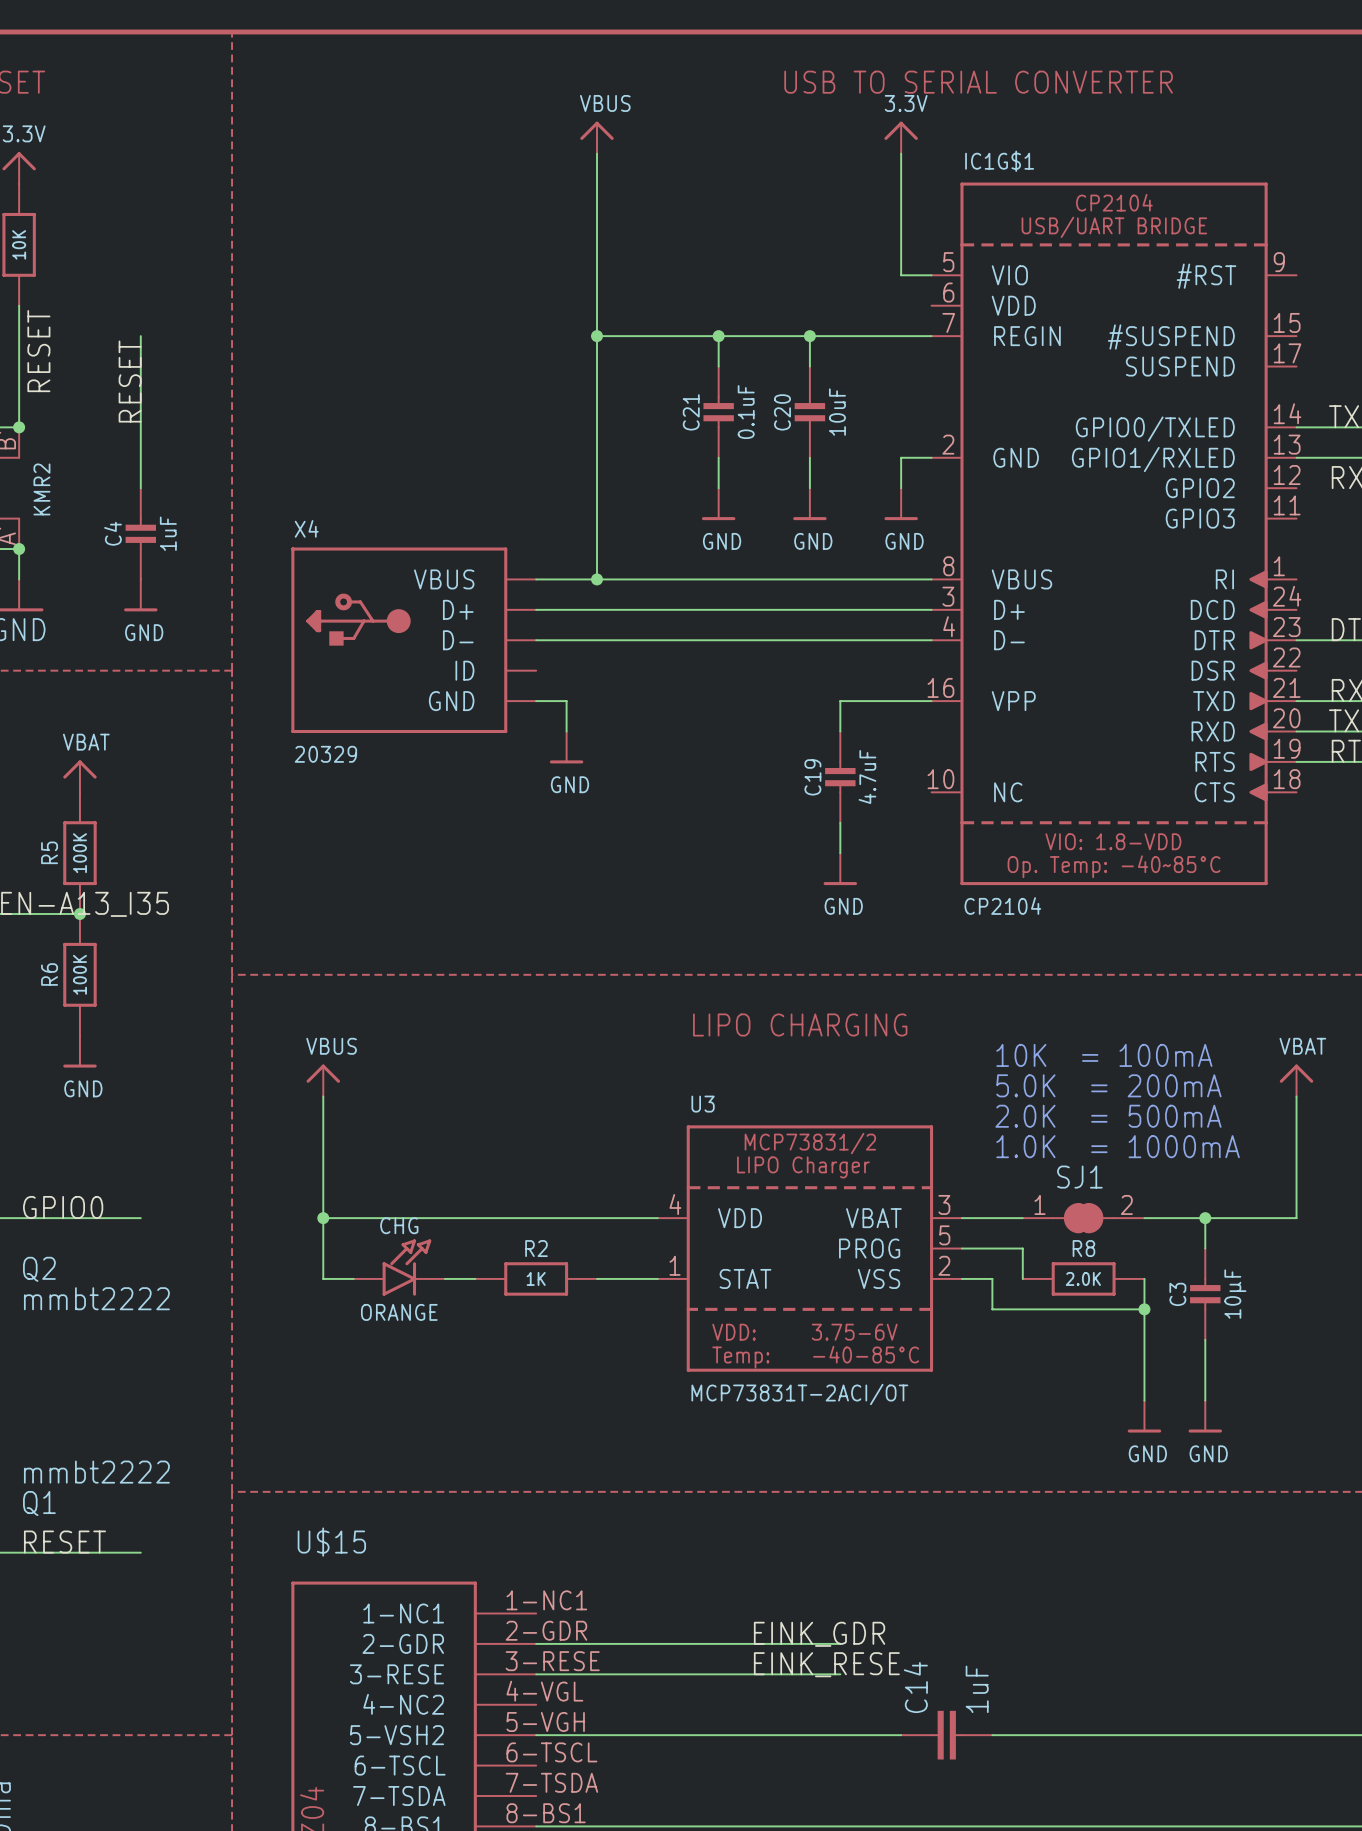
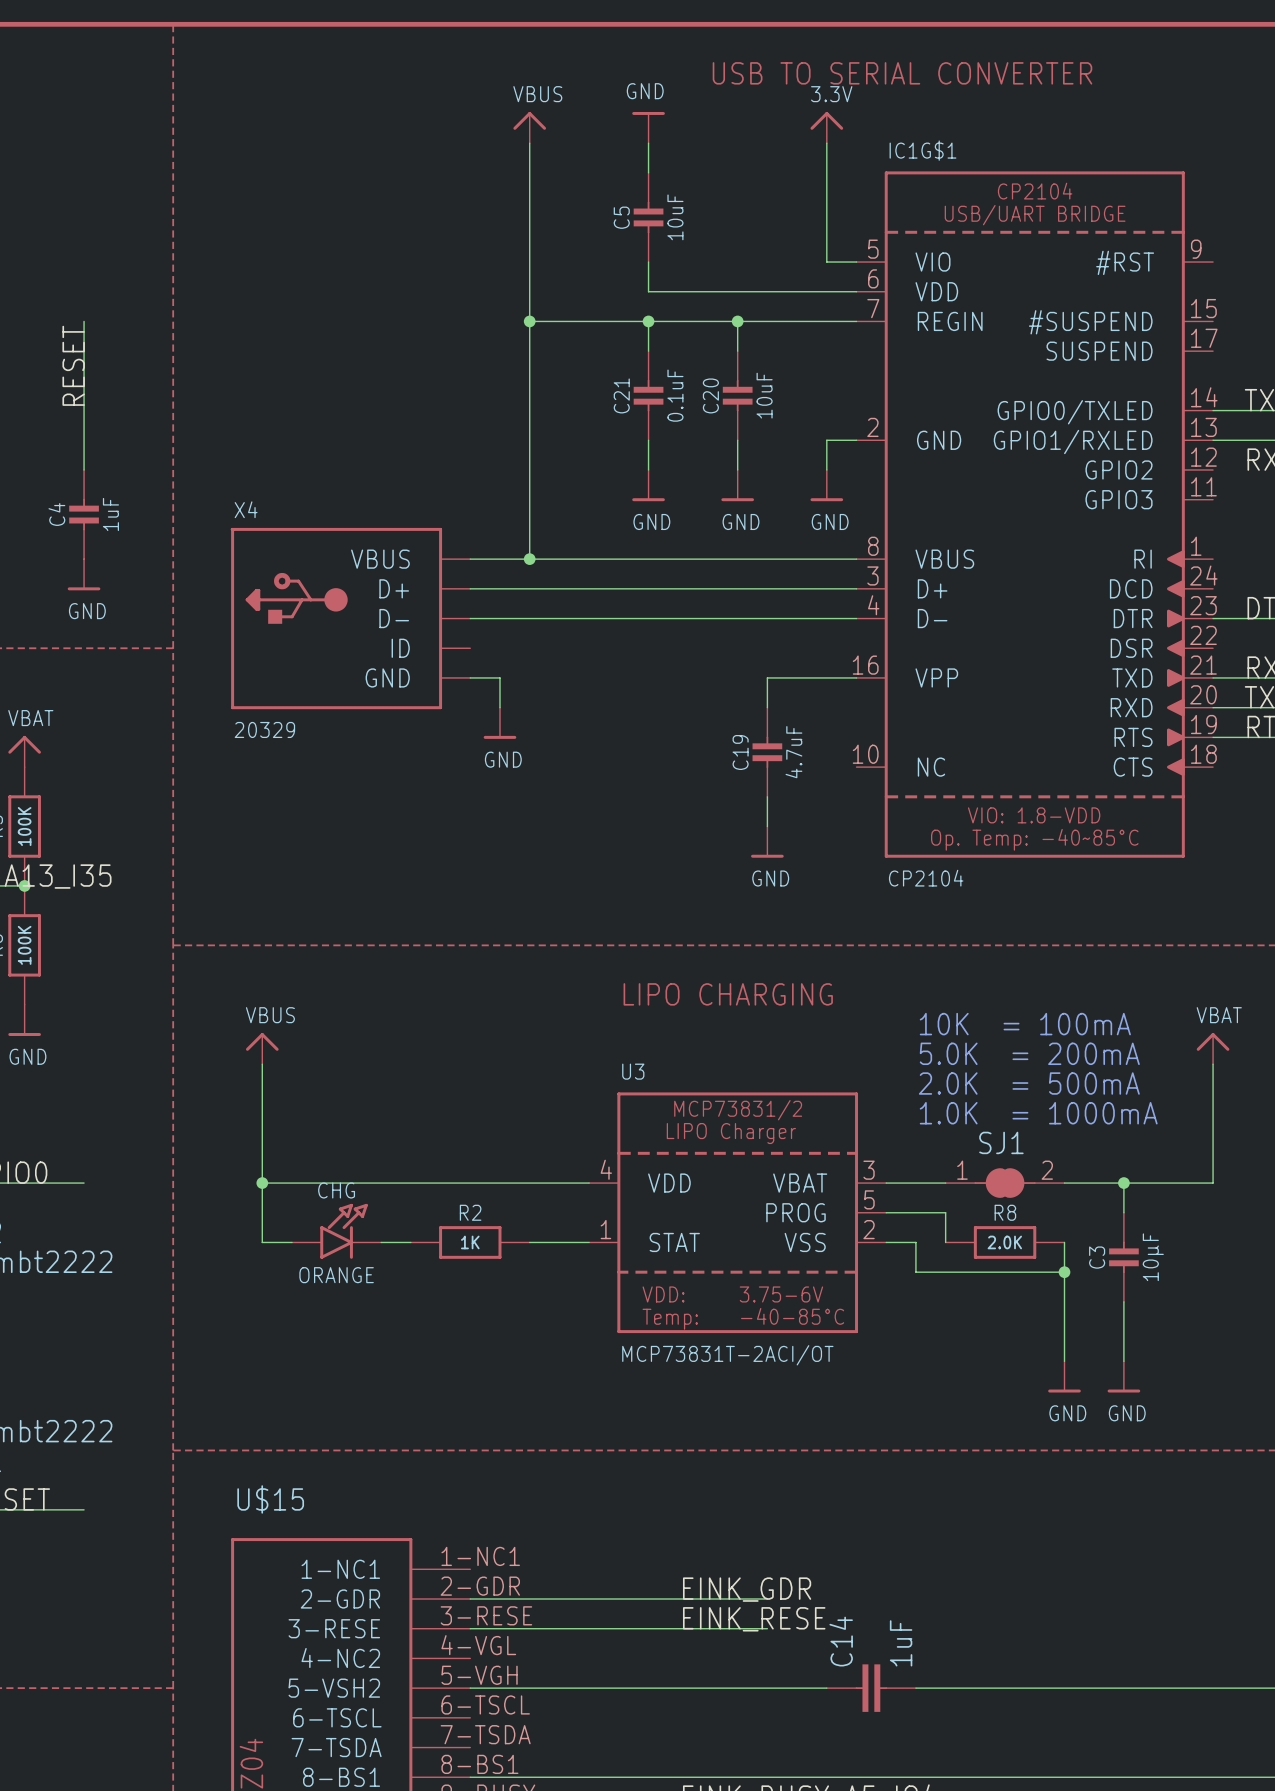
power symbol: none -> GND (648, 127)
wire: none -> (648, 143) (648, 172)
C5: none -> 10uF (648, 217)
wire: none -> (648, 262) (648, 291) (856, 291)

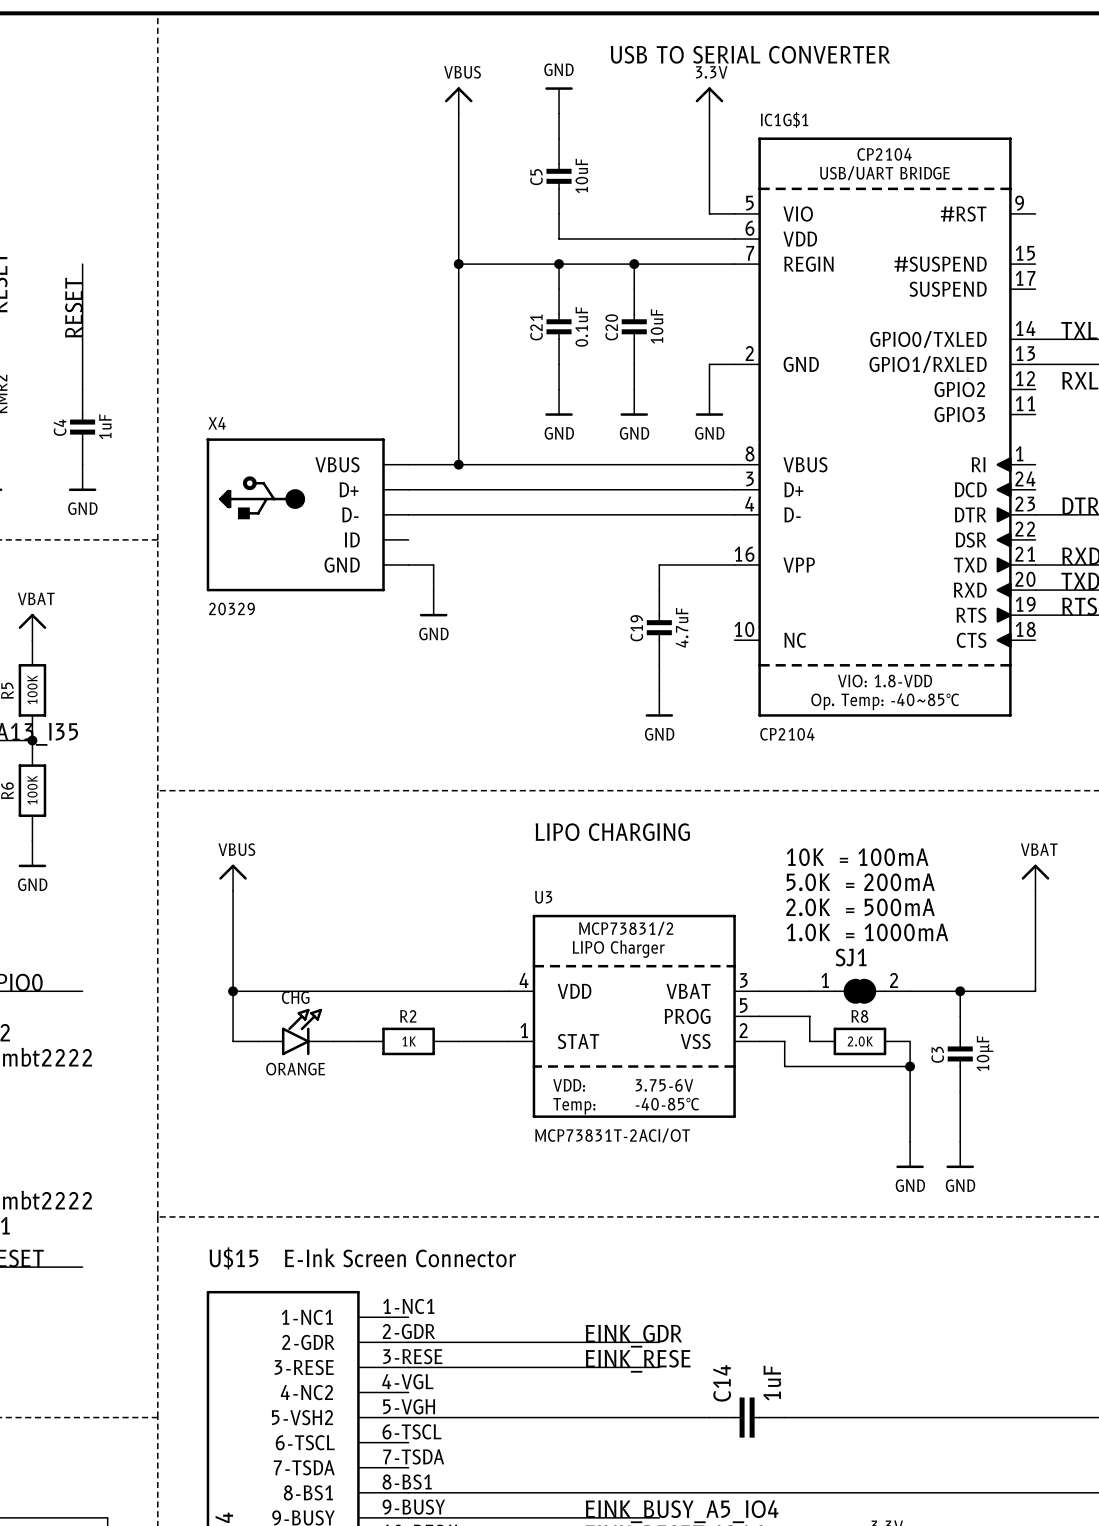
text: none -> E-Ink Screen Connector (400, 1257)

